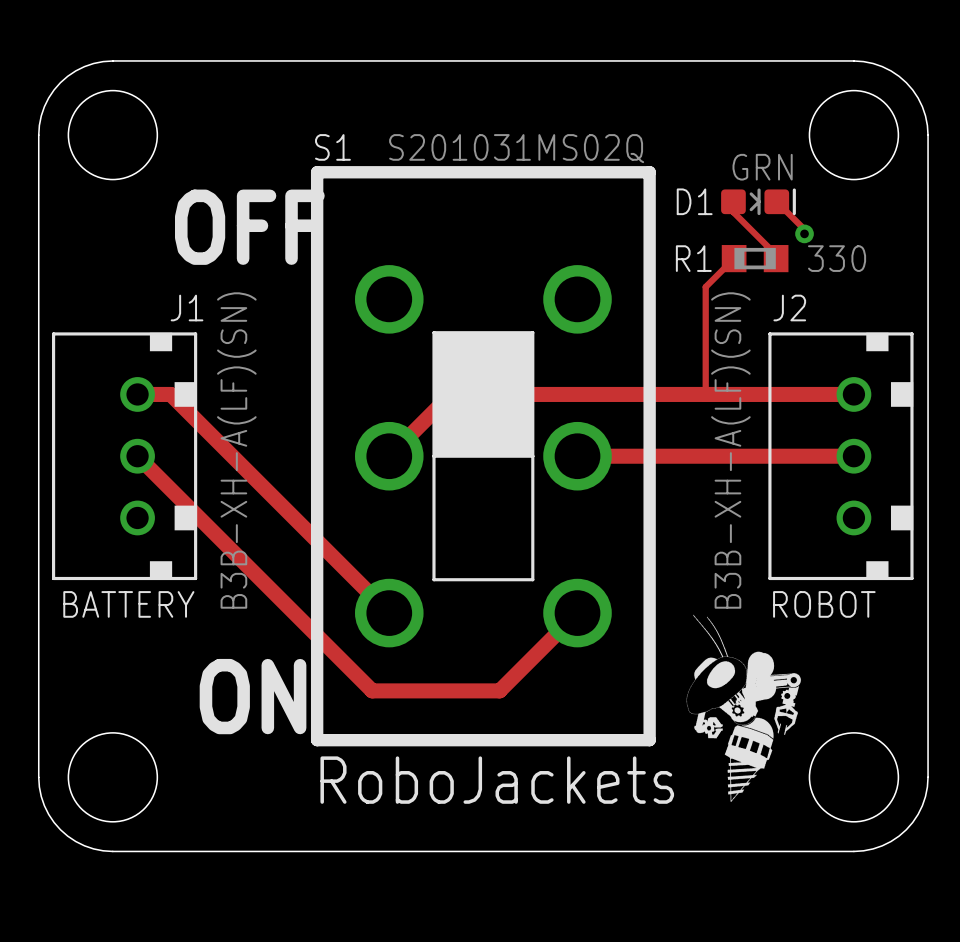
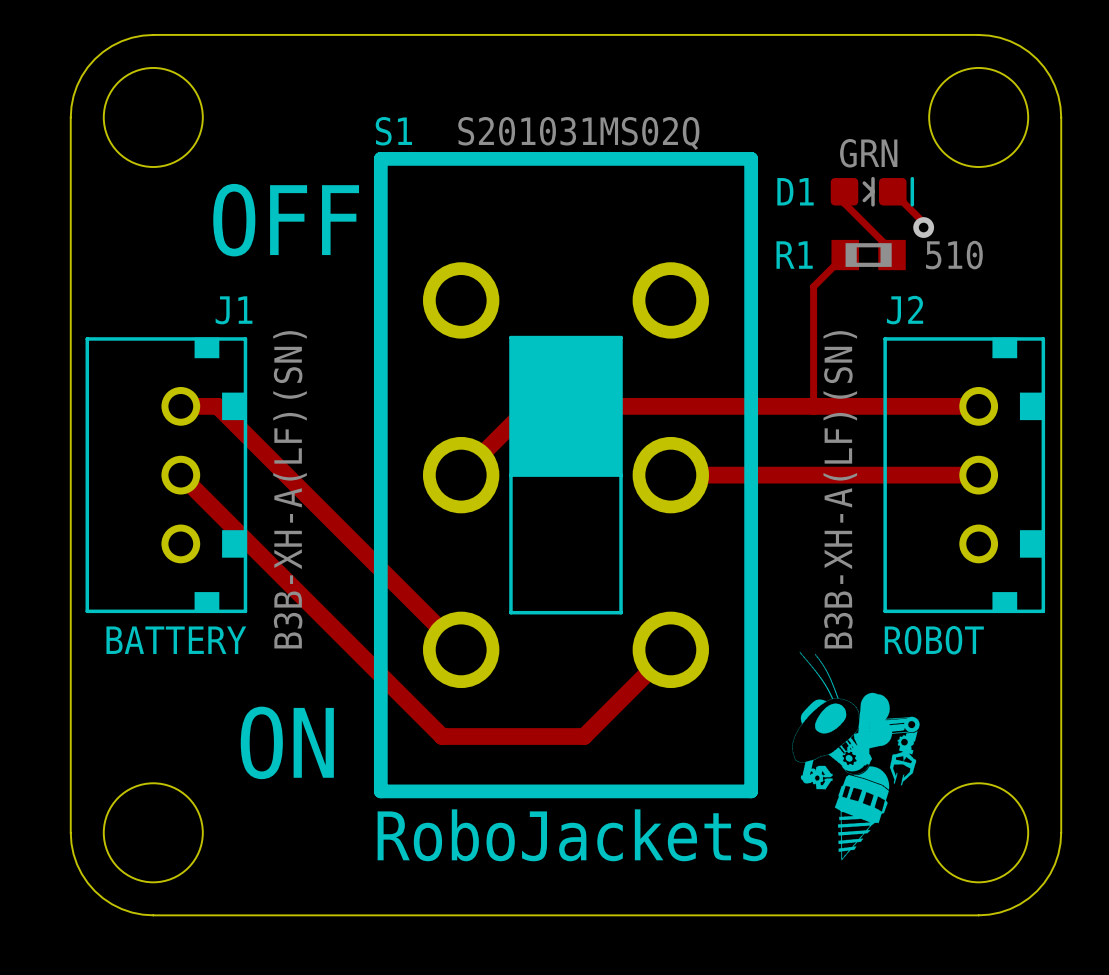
R1 value: 330 (837, 258) -> 510 (954, 255)

